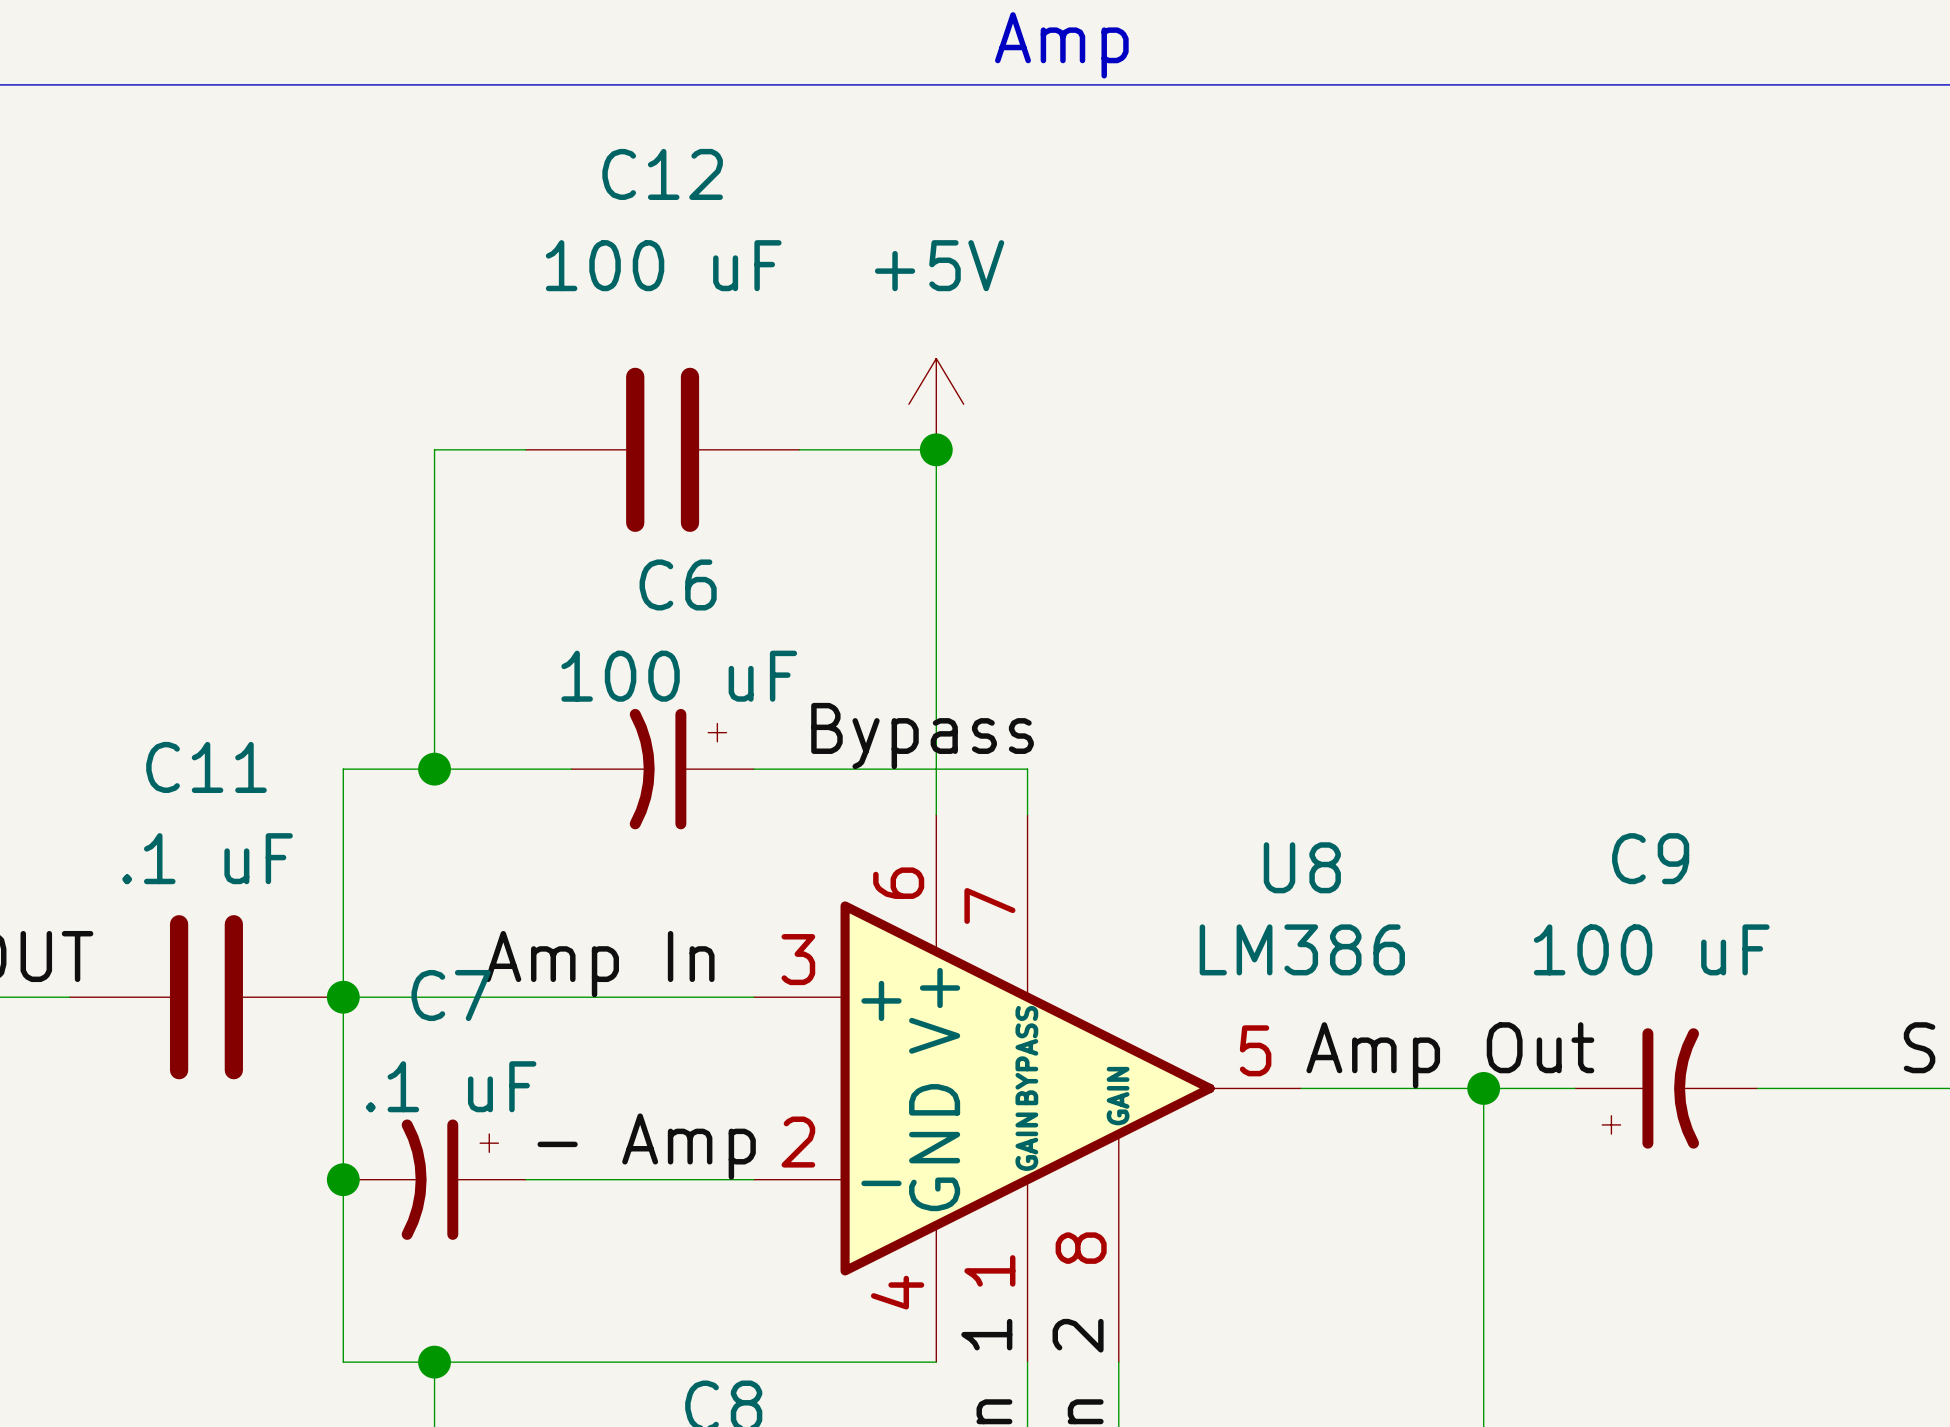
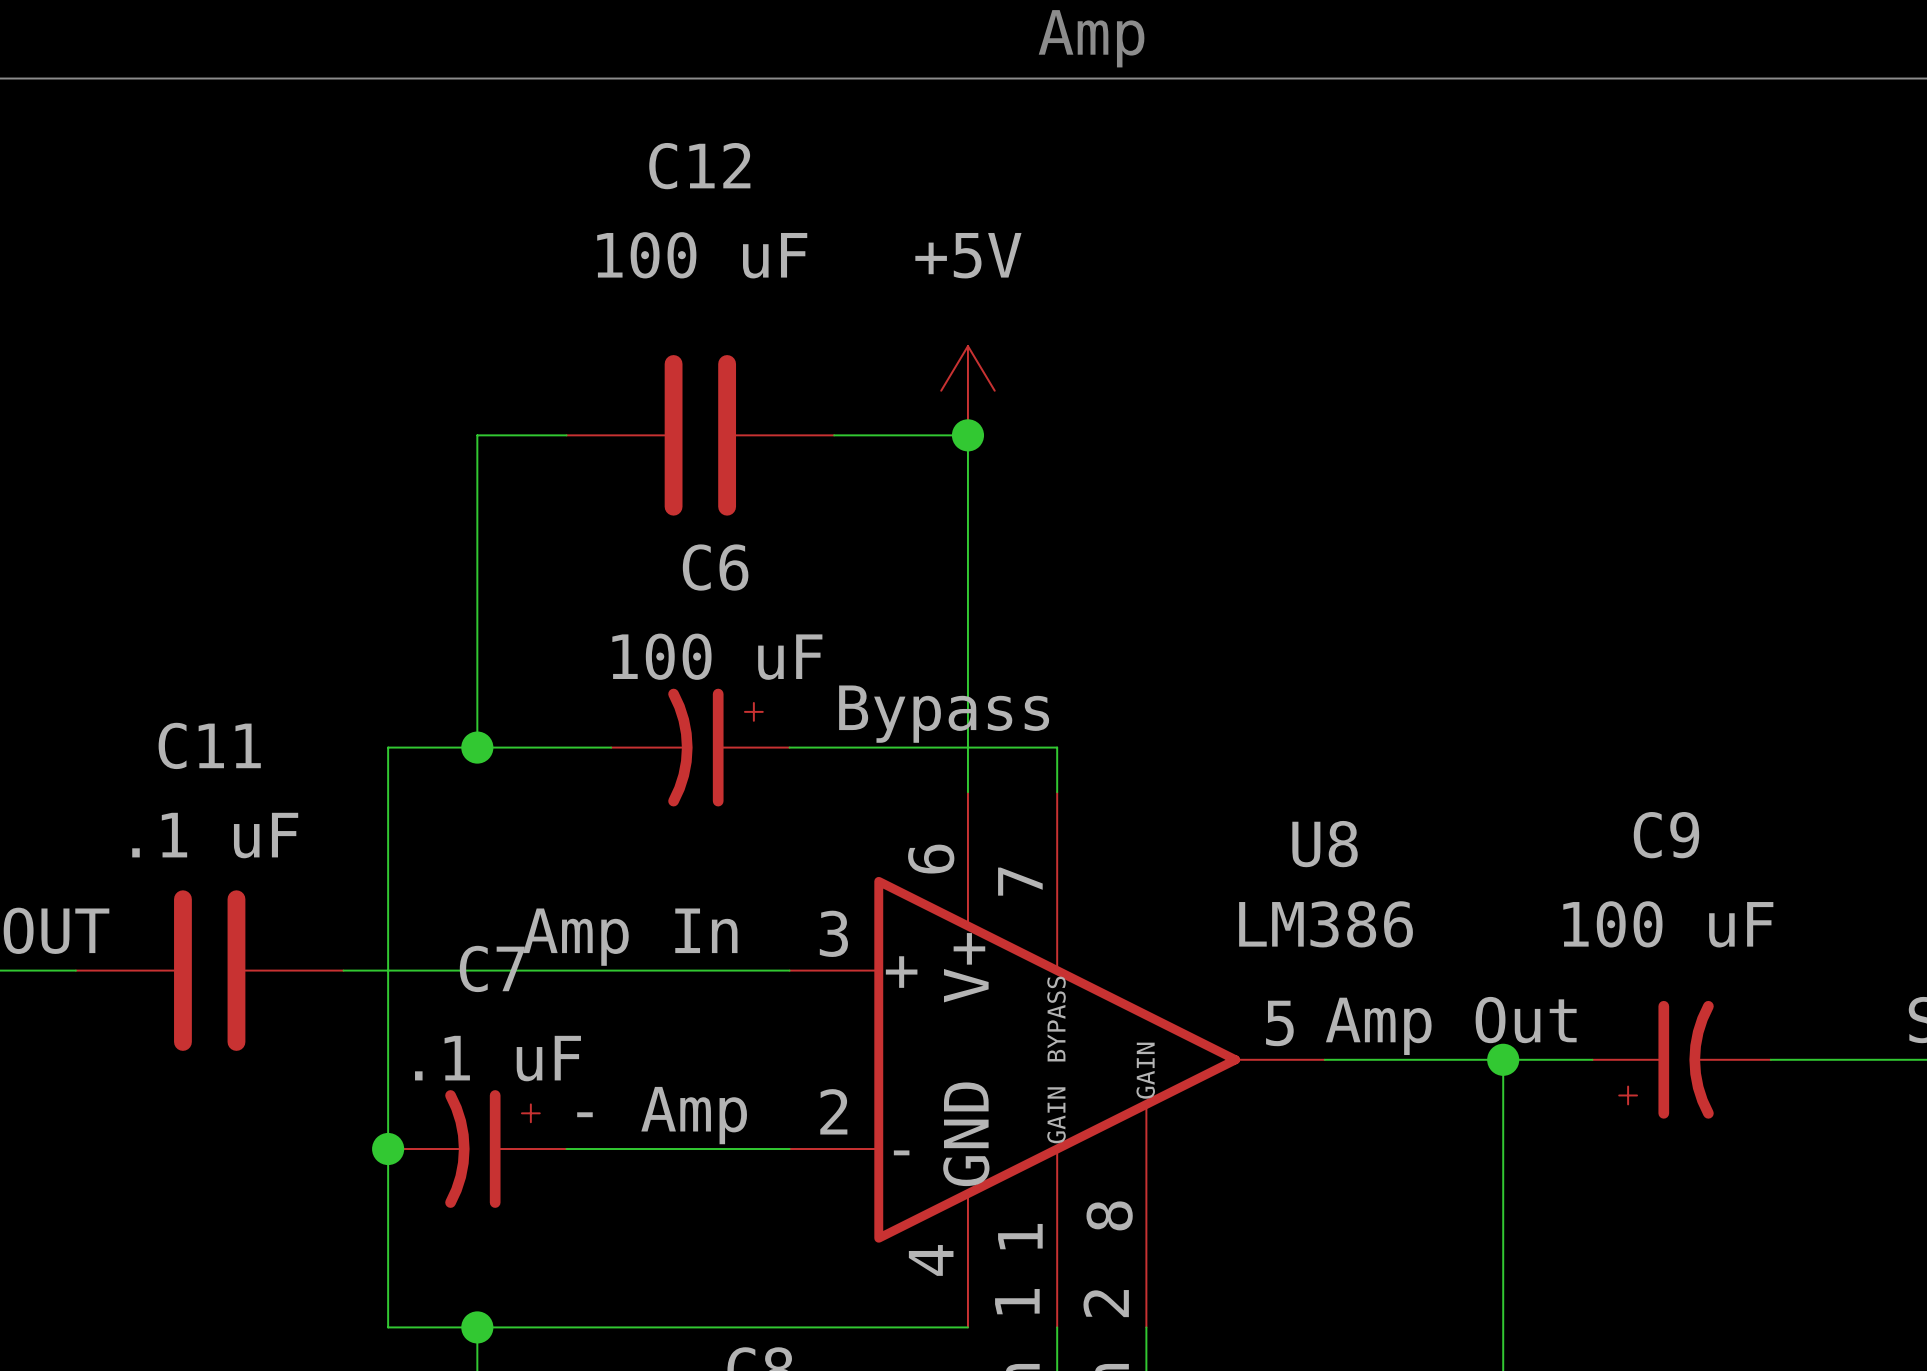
C11 position: (206, 997) -> (209, 970)
junction: (343, 997) -> none

